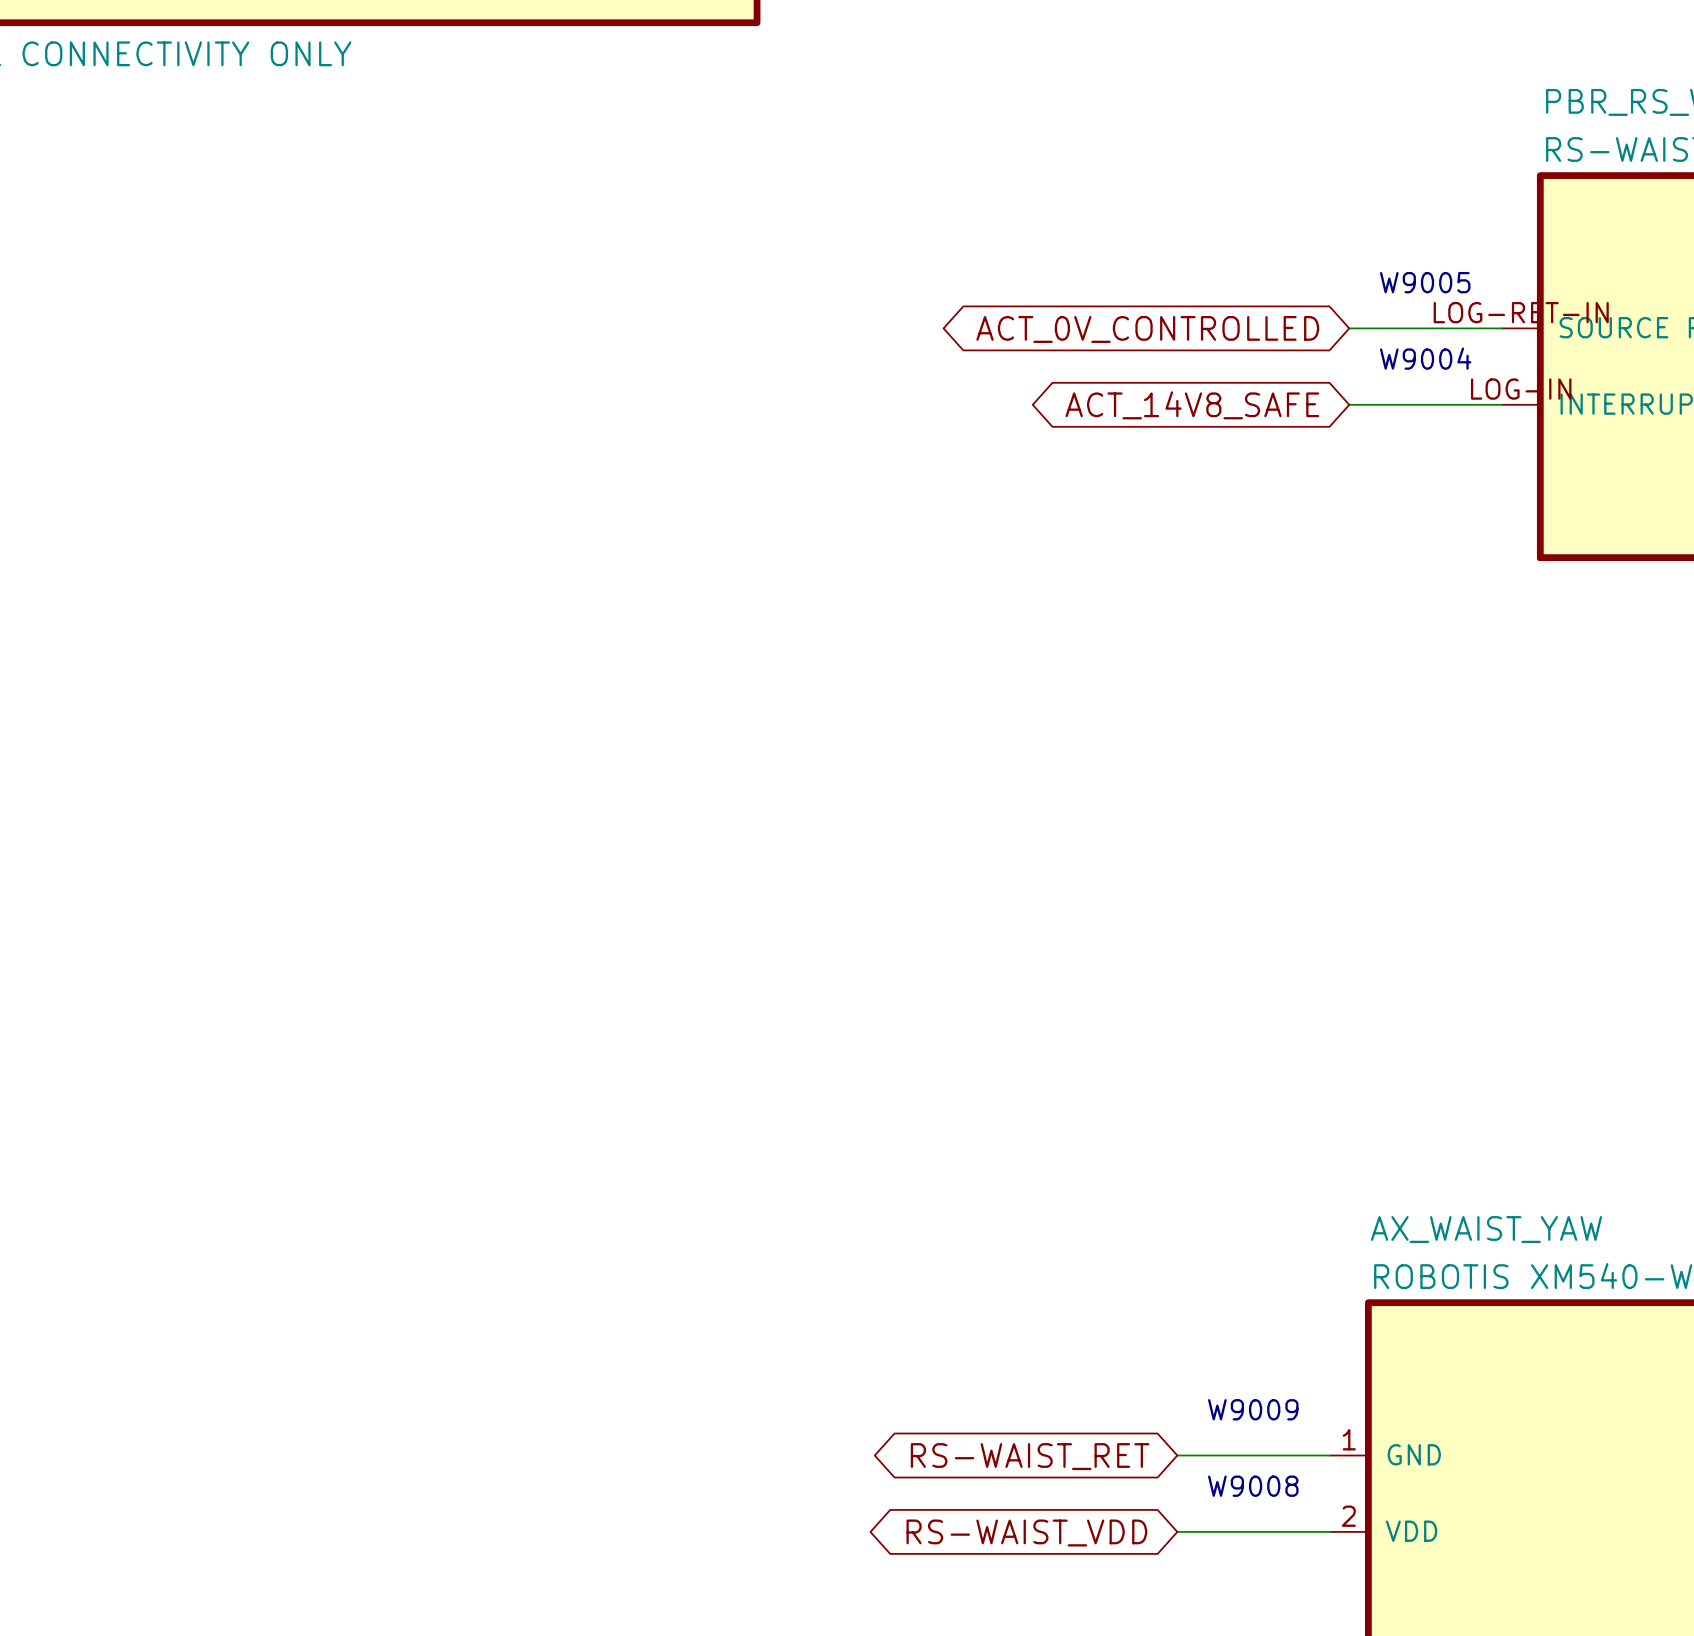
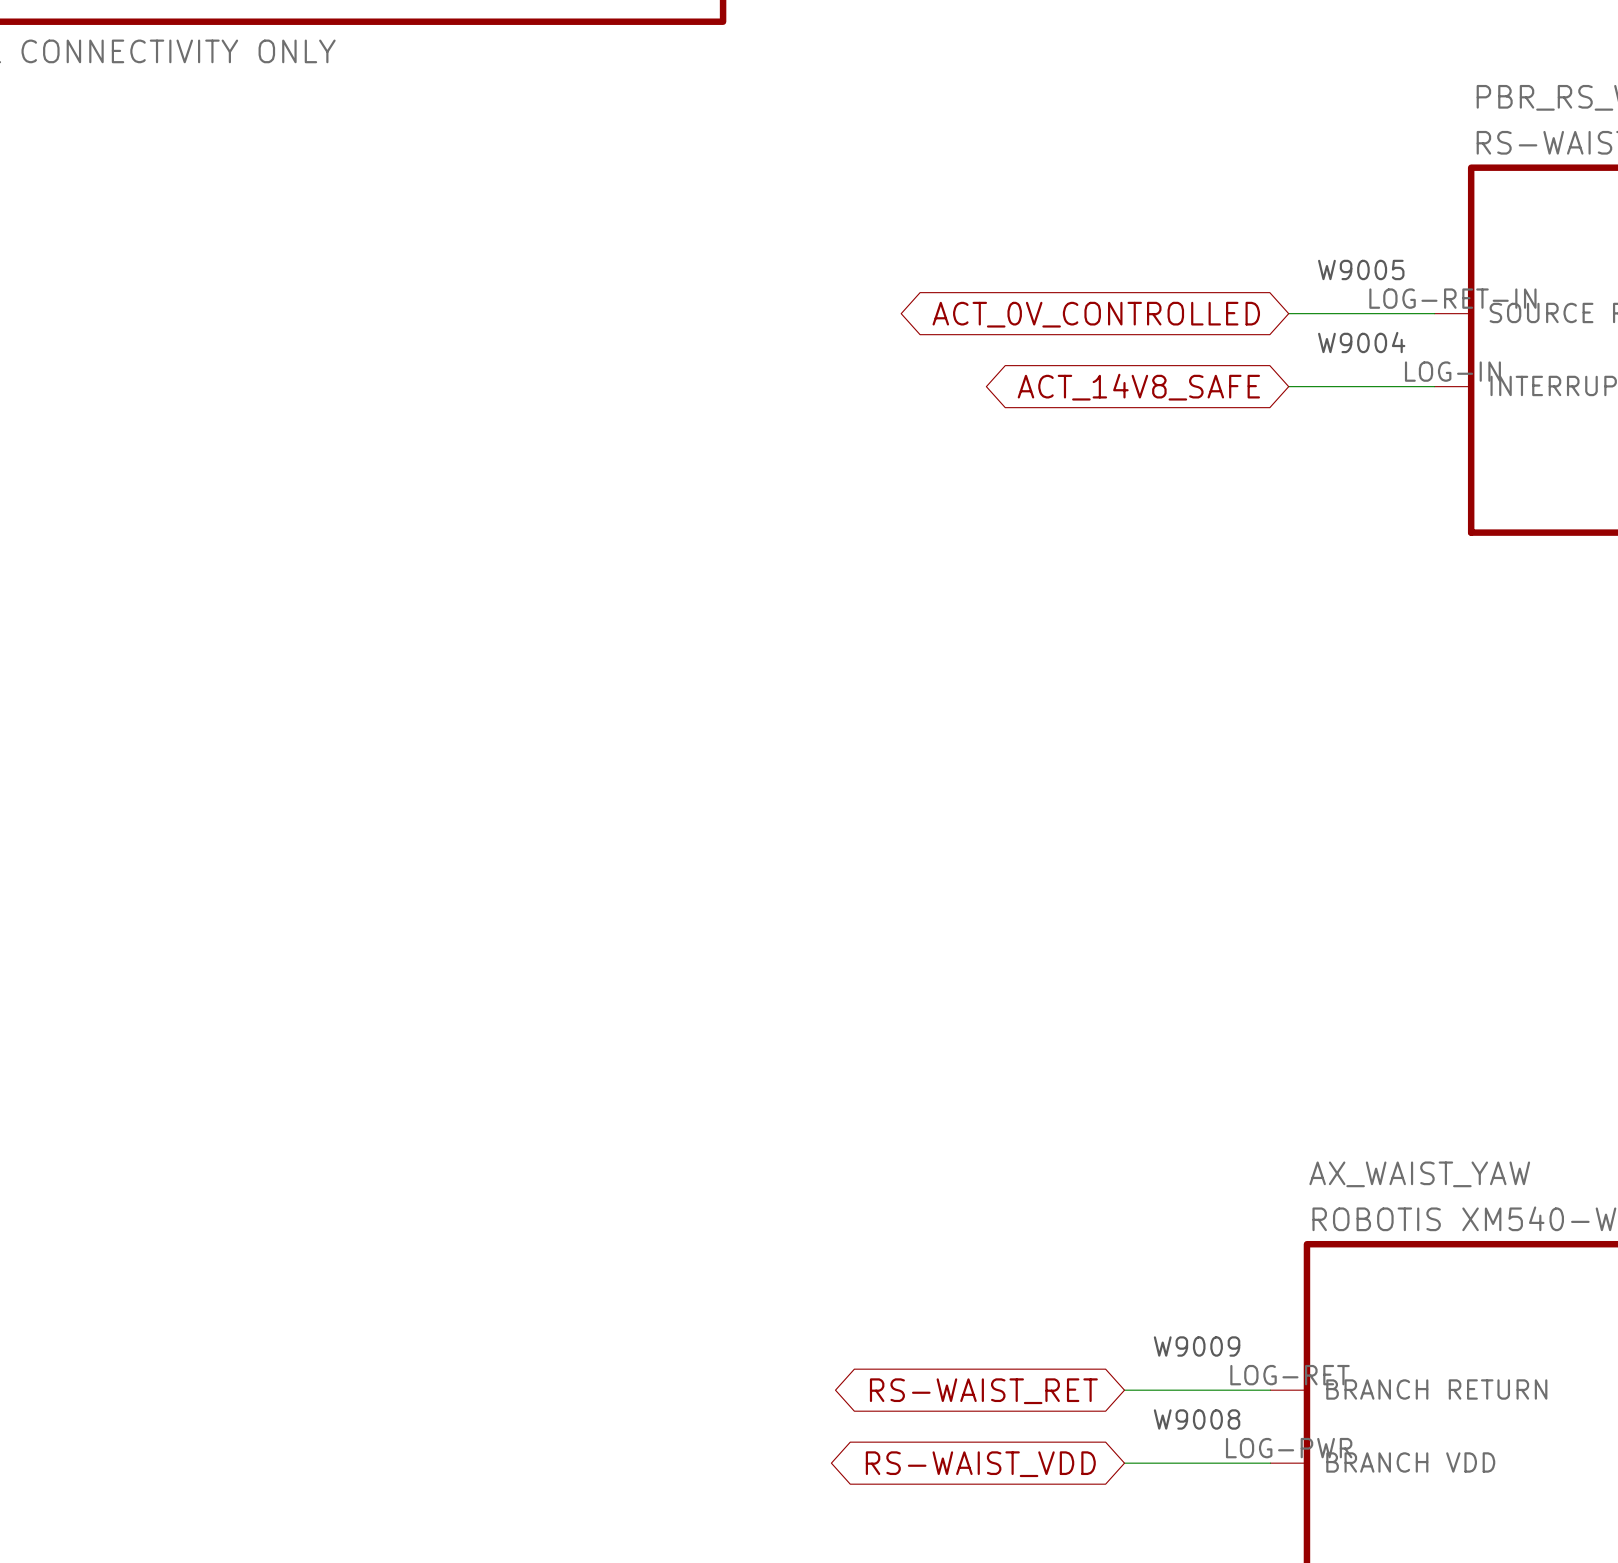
AX_WAIST_YAW pin number: 1 (1349, 1439) -> LOG-RET (1290, 1375)
AX_WAIST_YAW pin name: GND (1414, 1454) -> BRANCH RETURN (1436, 1389)
AX_WAIST_YAW pin number: 2 (1348, 1516) -> LOG-PWR (1289, 1448)
AX_WAIST_YAW pin name: VDD (1411, 1531) -> BRANCH VDD (1410, 1462)

